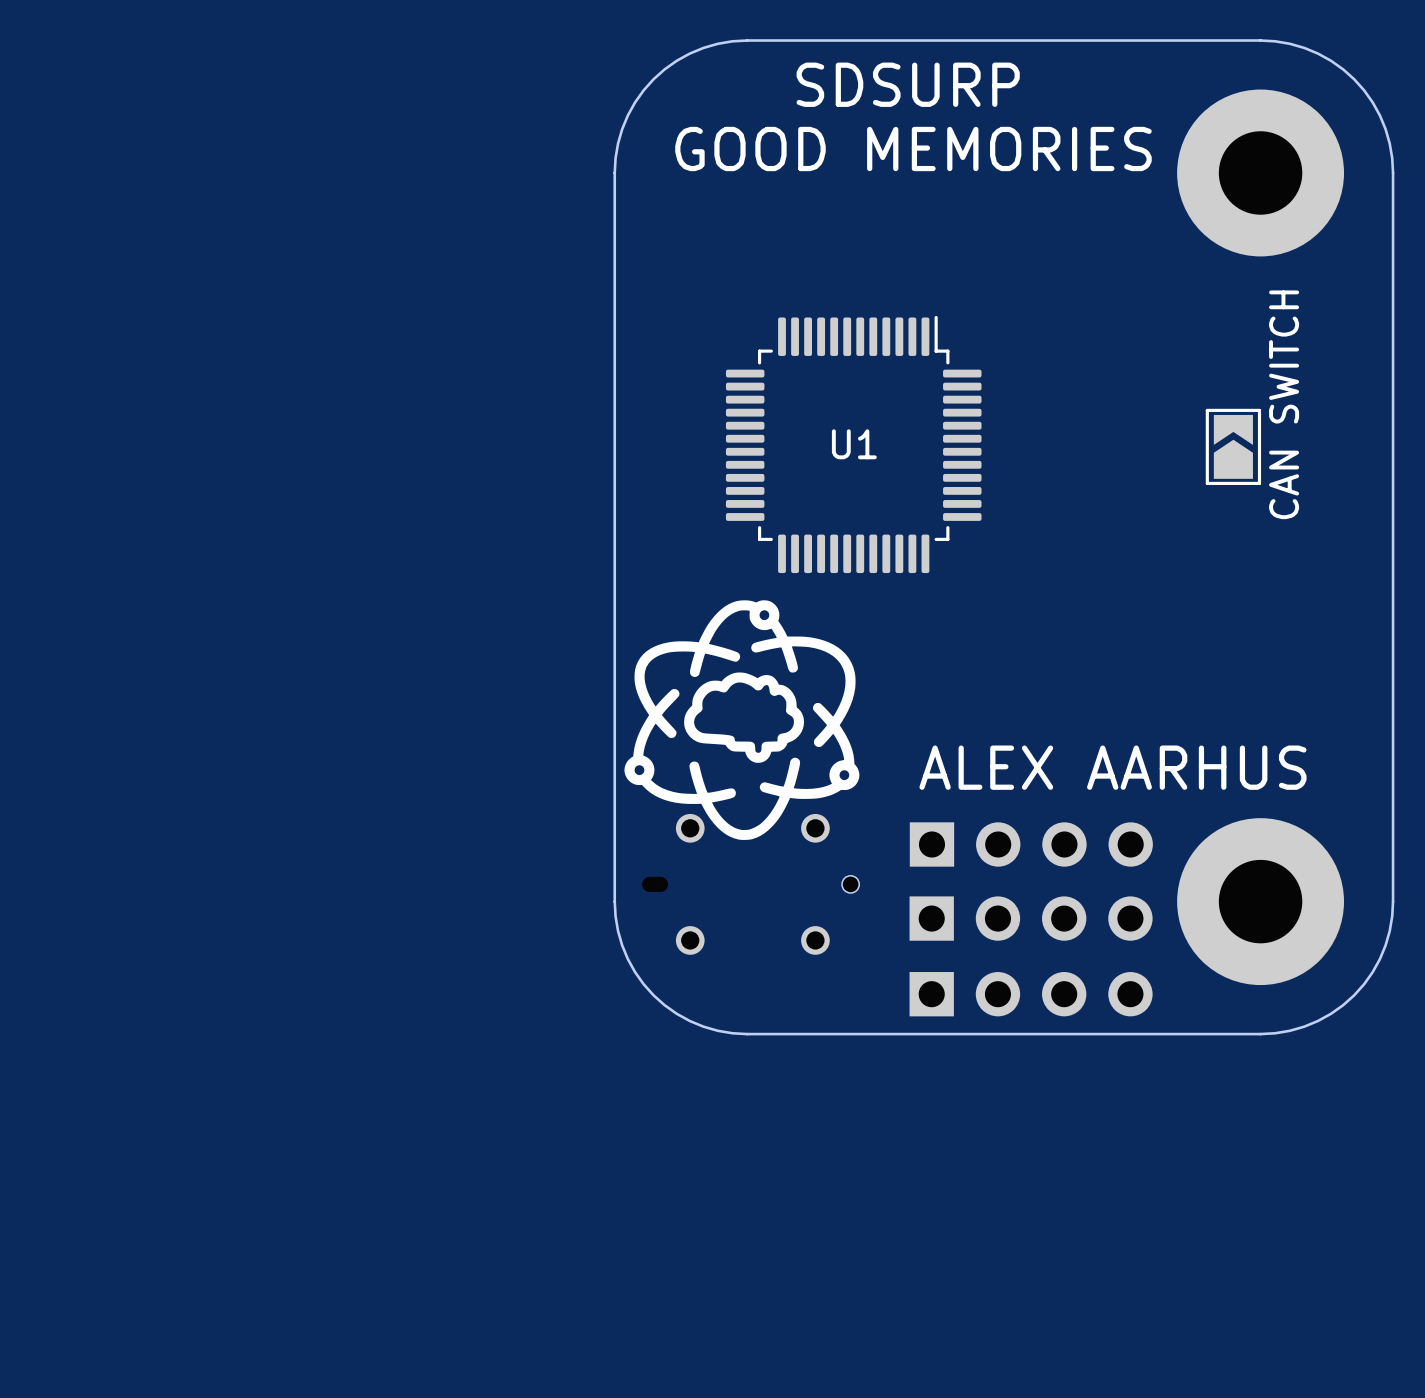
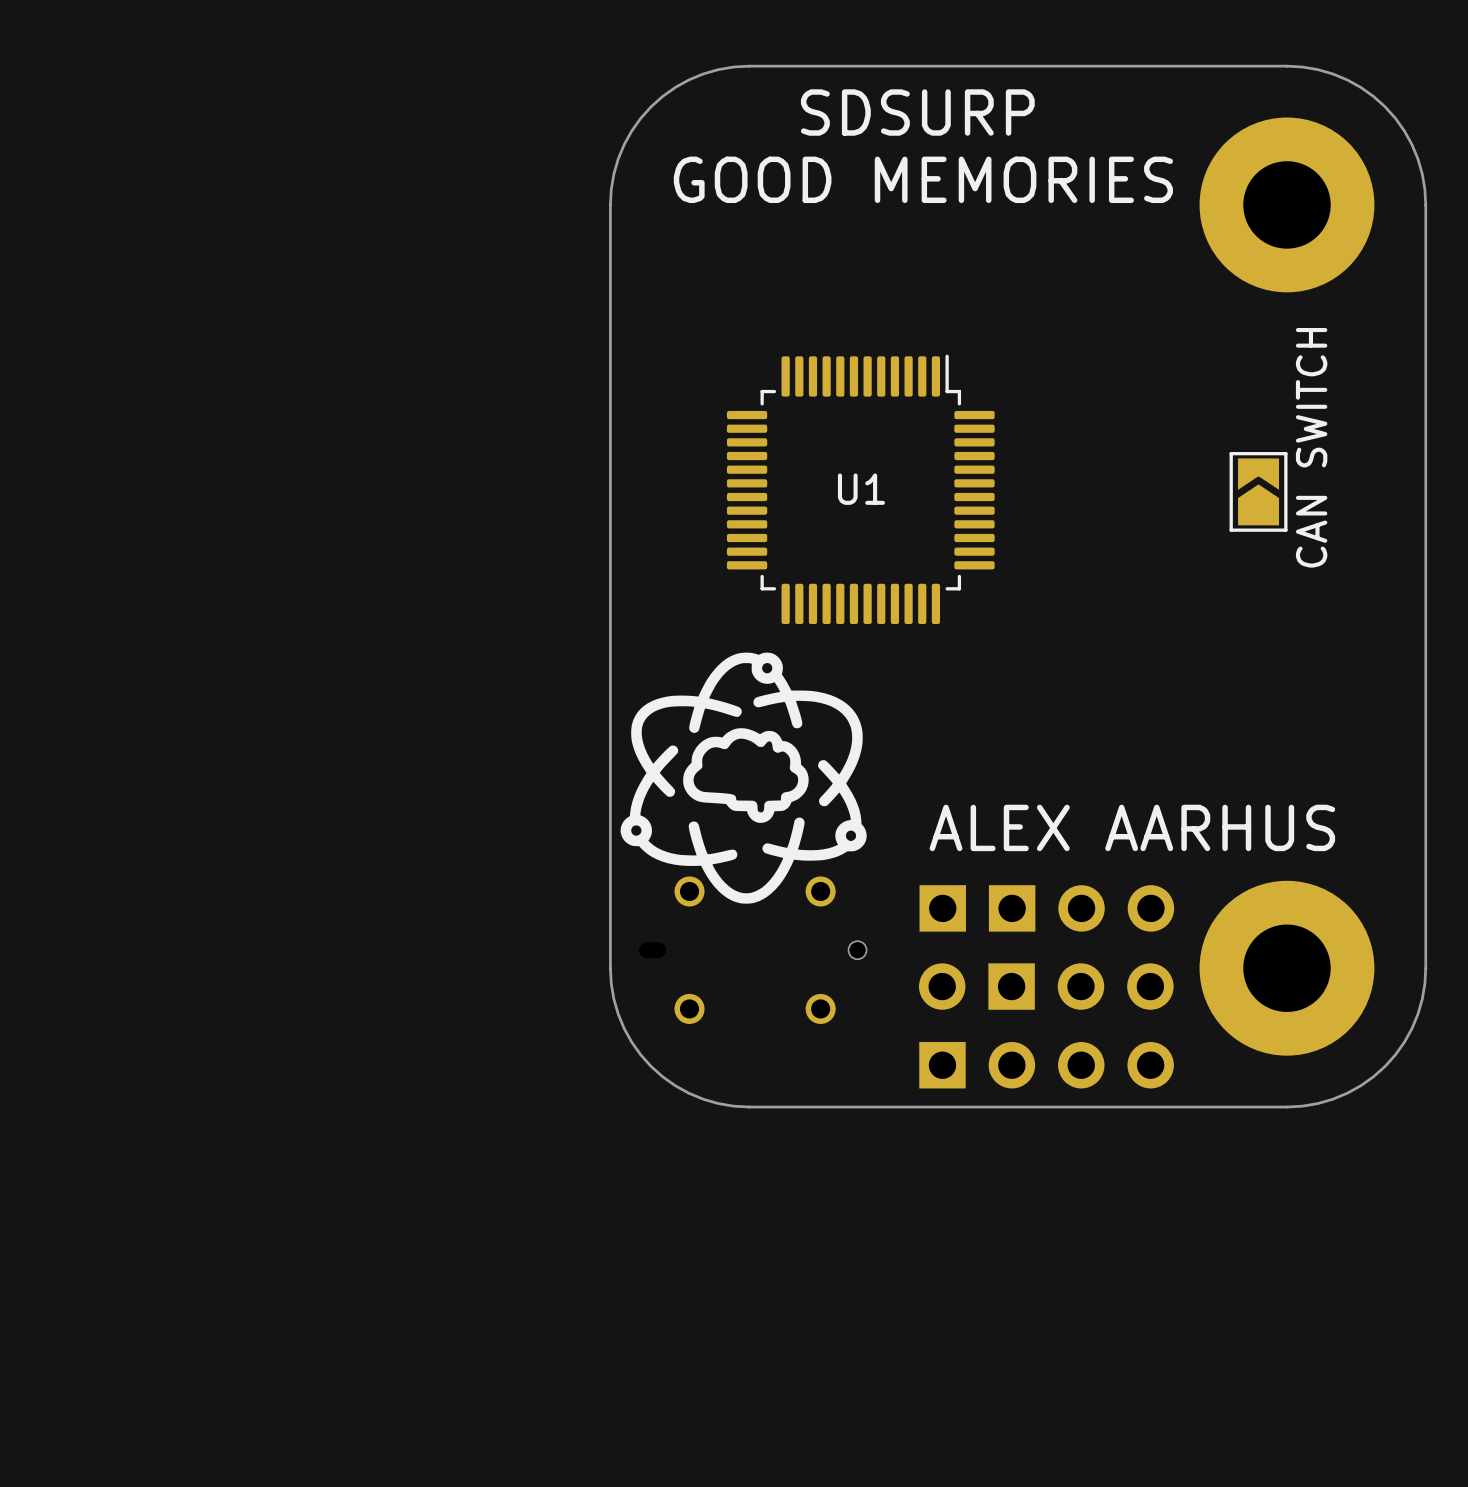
part footprint: [909, 822, 1153, 867] -> [919, 885, 1175, 932]
part footprint: [909, 896, 1153, 941] -> [918, 963, 1174, 1010]

